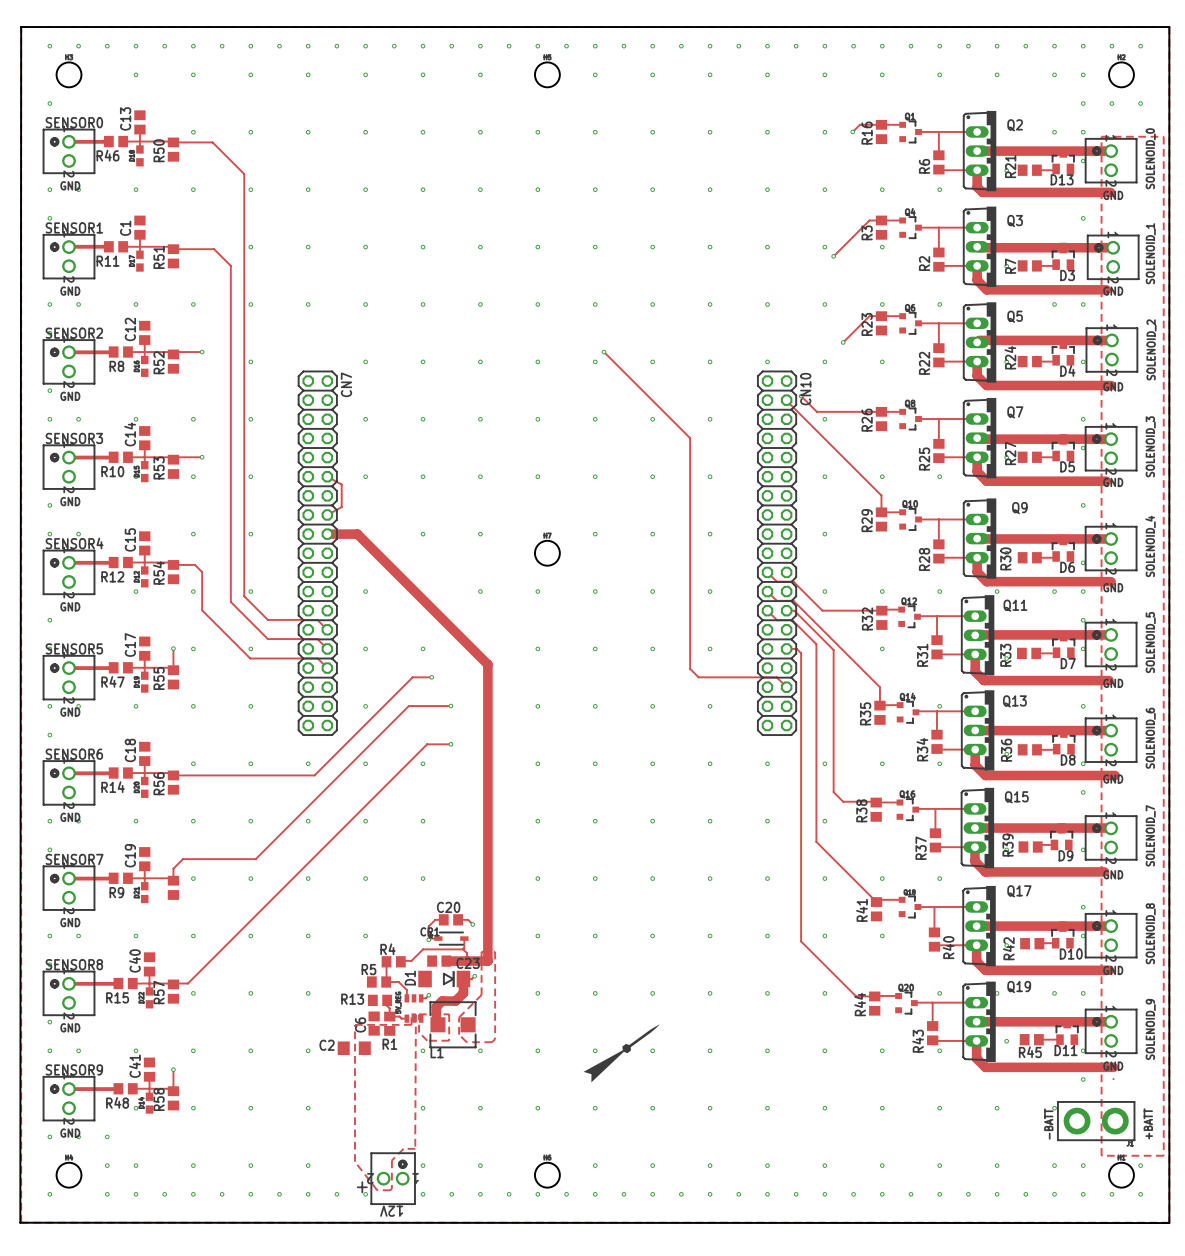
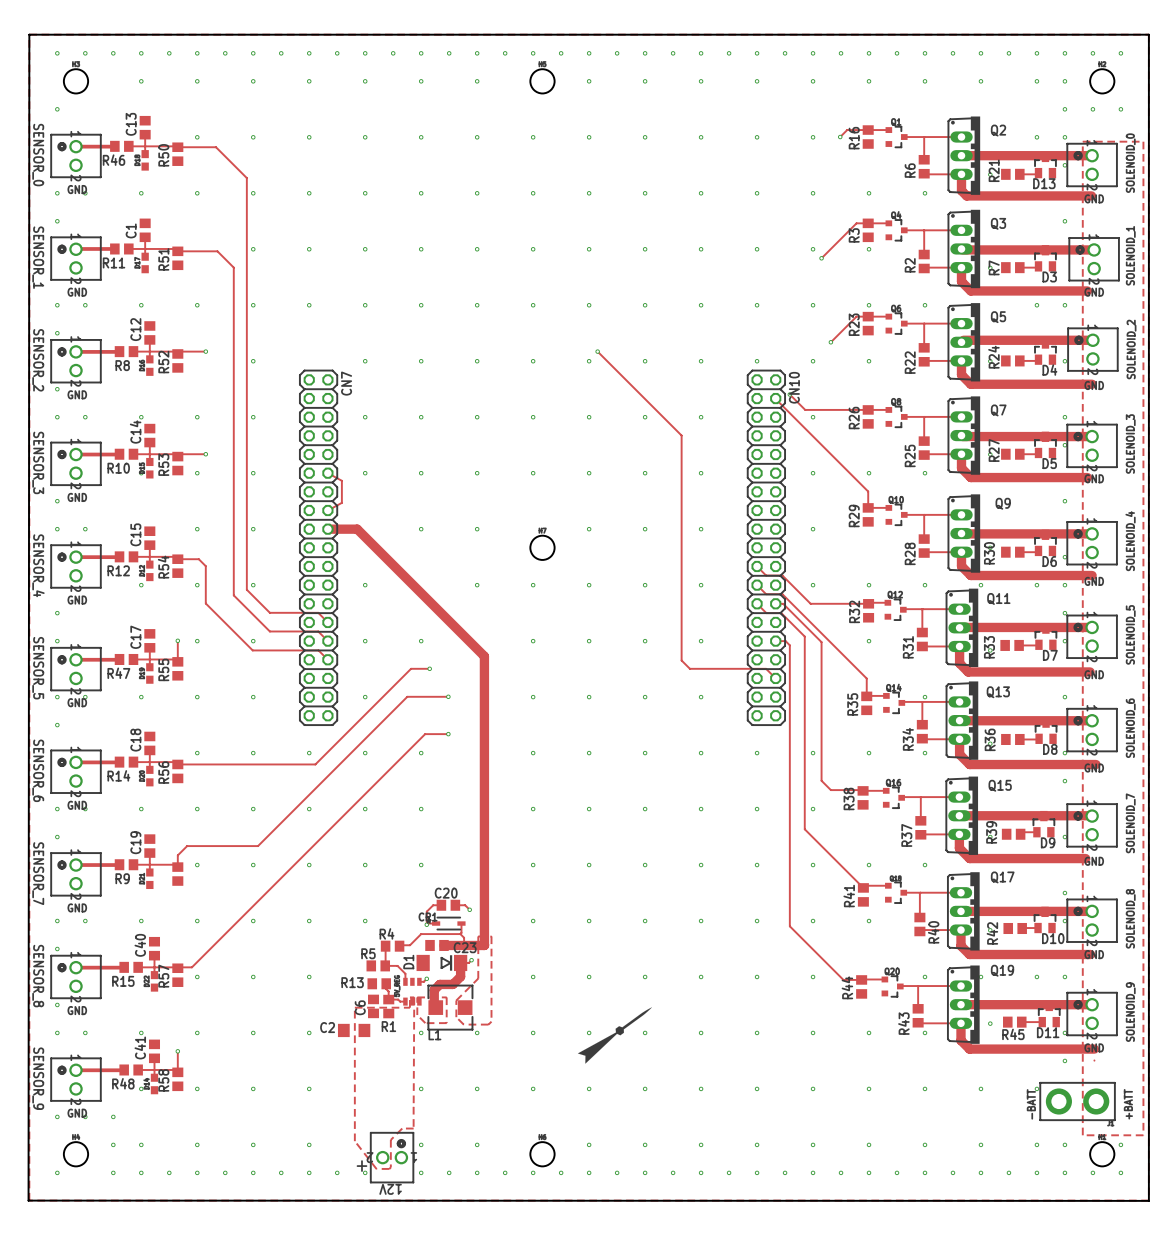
SENSOR0 name: SENSOR0 (74, 122) -> SENSOR_0 (38, 155)
SENSOR1 name: SENSOR1 (74, 227) -> SENSOR_1 (38, 257)
SENSOR2 name: SENSOR2 (74, 333) -> SENSOR_2 (38, 360)
SENSOR3 name: SENSOR3 (74, 438) -> SENSOR_3 (38, 462)
SENSOR4 name: SENSOR4 (74, 543) -> SENSOR_4 (38, 565)
SENSOR5 name: SENSOR5 (74, 648) -> SENSOR_5 (38, 668)
SENSOR6 name: SENSOR6 (74, 754) -> SENSOR_6 (38, 770)
SENSOR7 name: SENSOR7 (74, 859) -> SENSOR_7 (38, 873)
SENSOR8 name: SENSOR8 (74, 964) -> SENSOR_8 (38, 976)
SENSOR9 name: SENSOR9 (74, 1069) -> SENSOR_9 (38, 1078)

